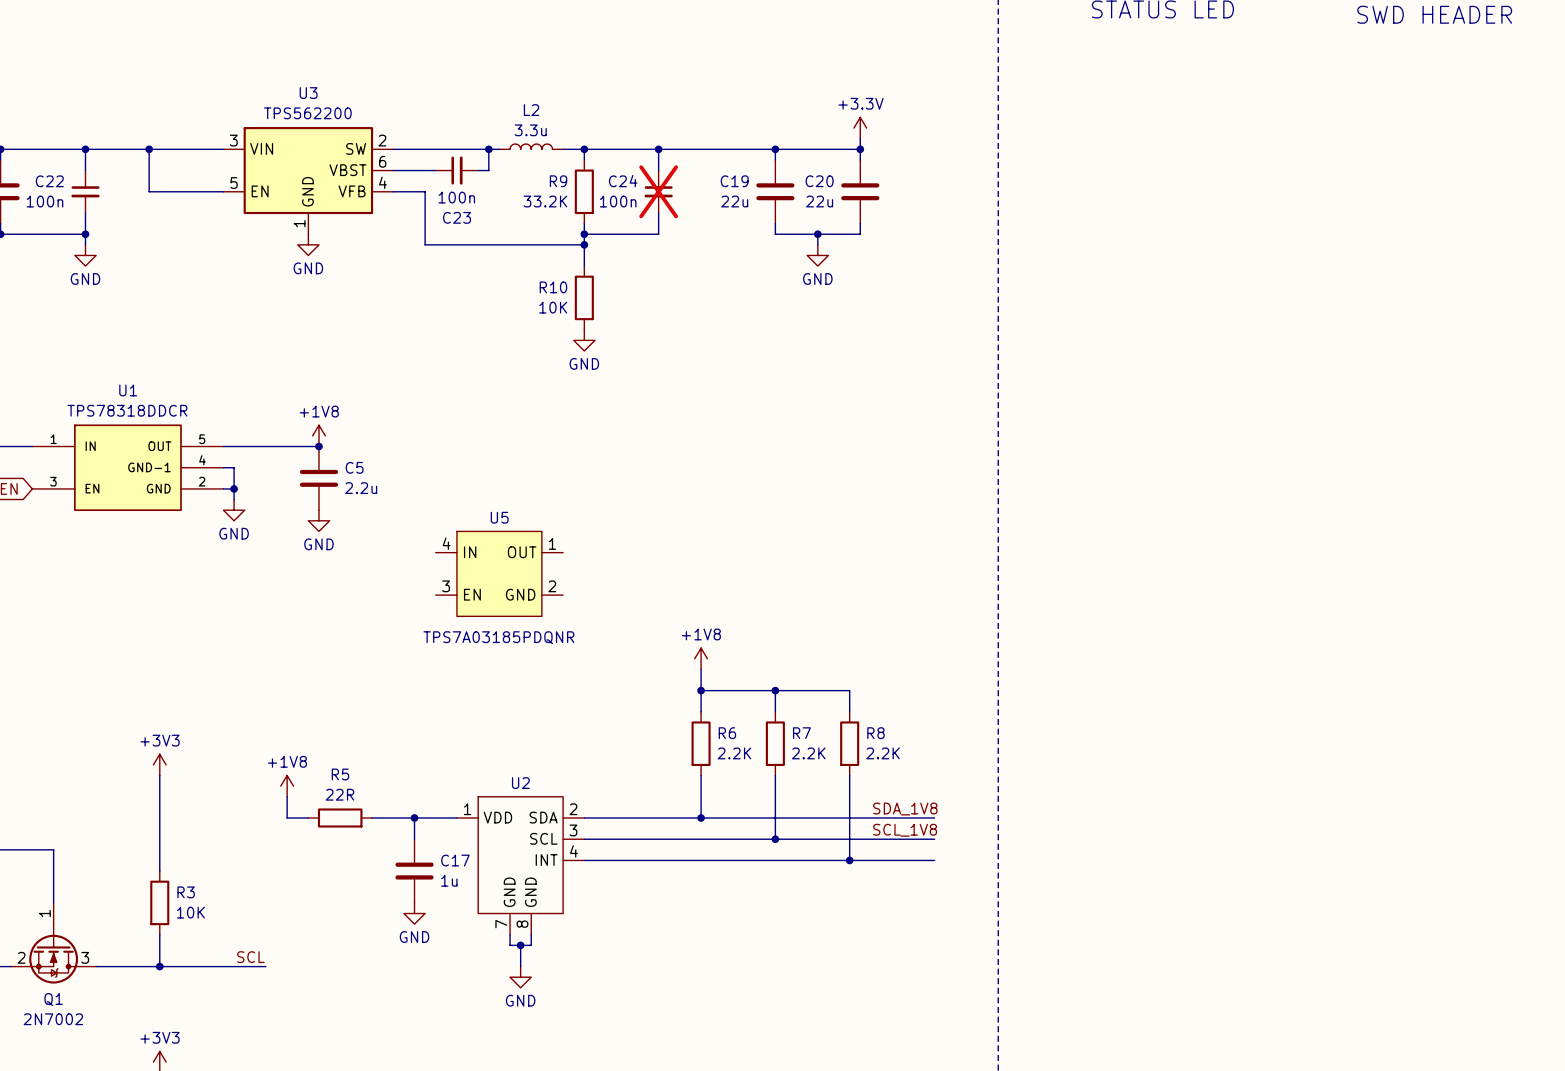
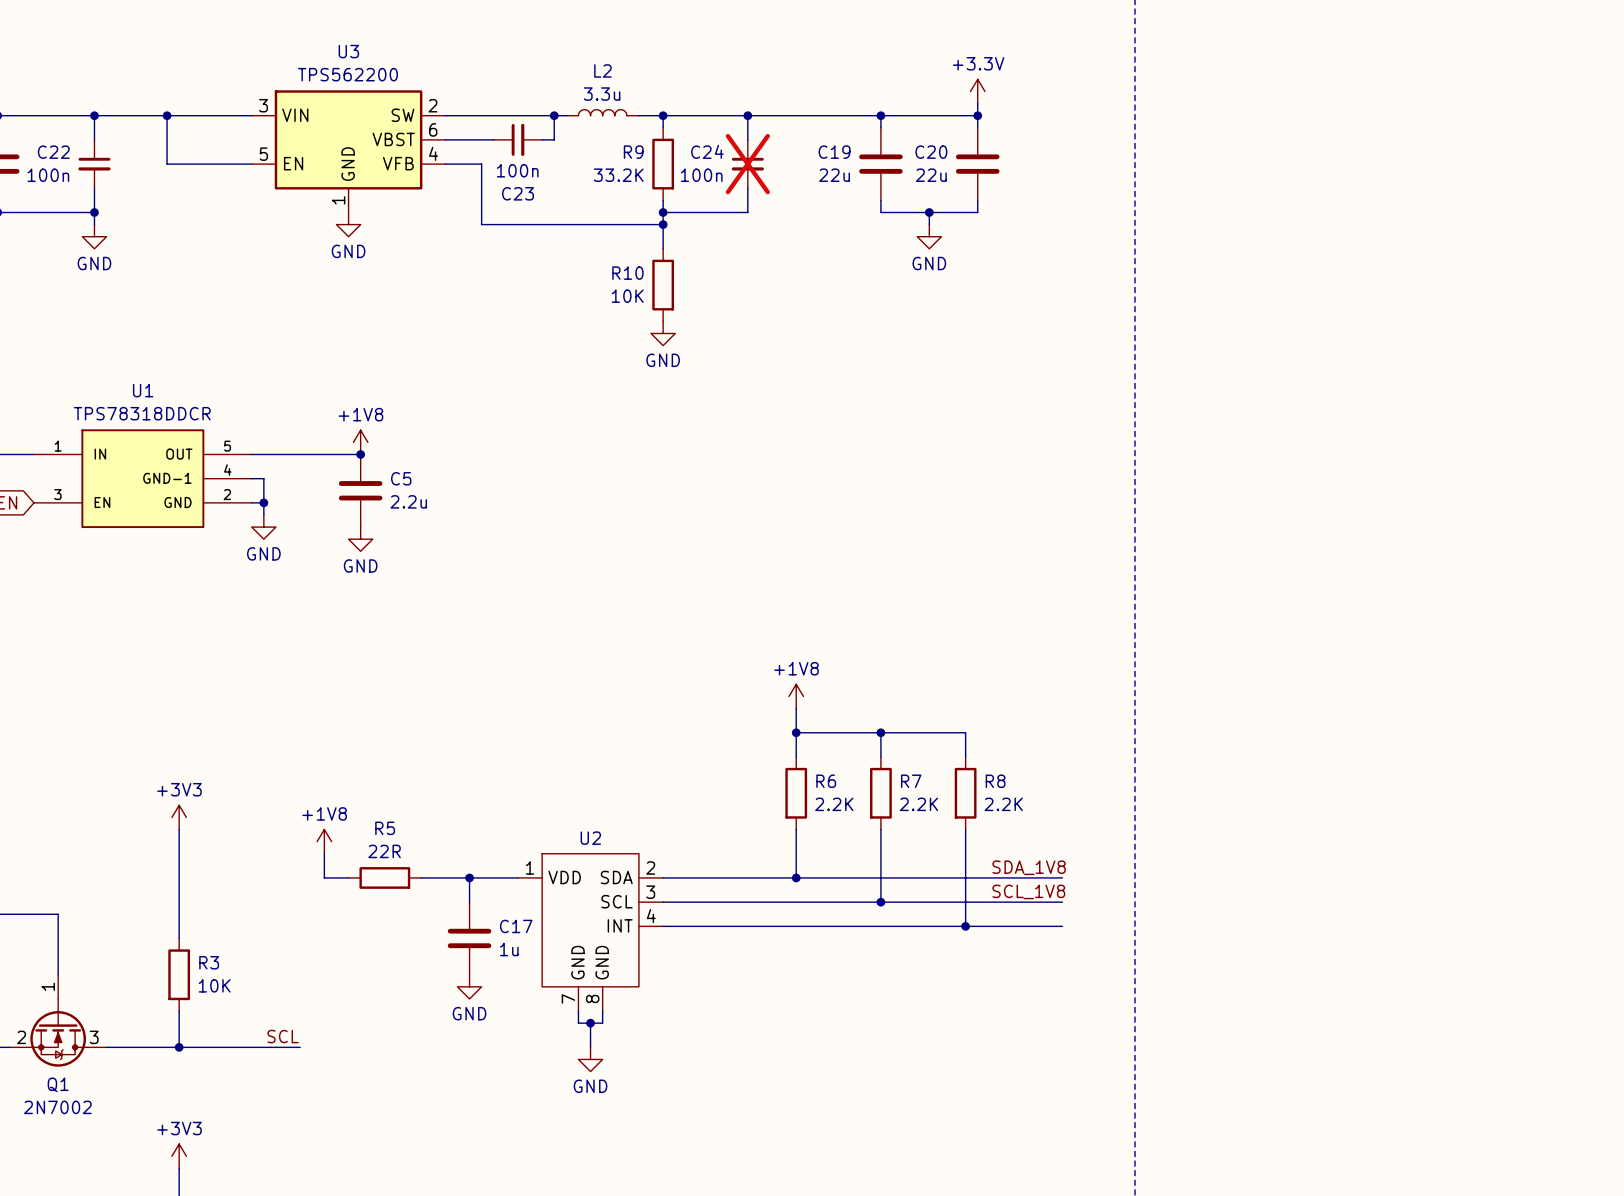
U5: TPS7A03185PDQNR (499, 573) -> none

